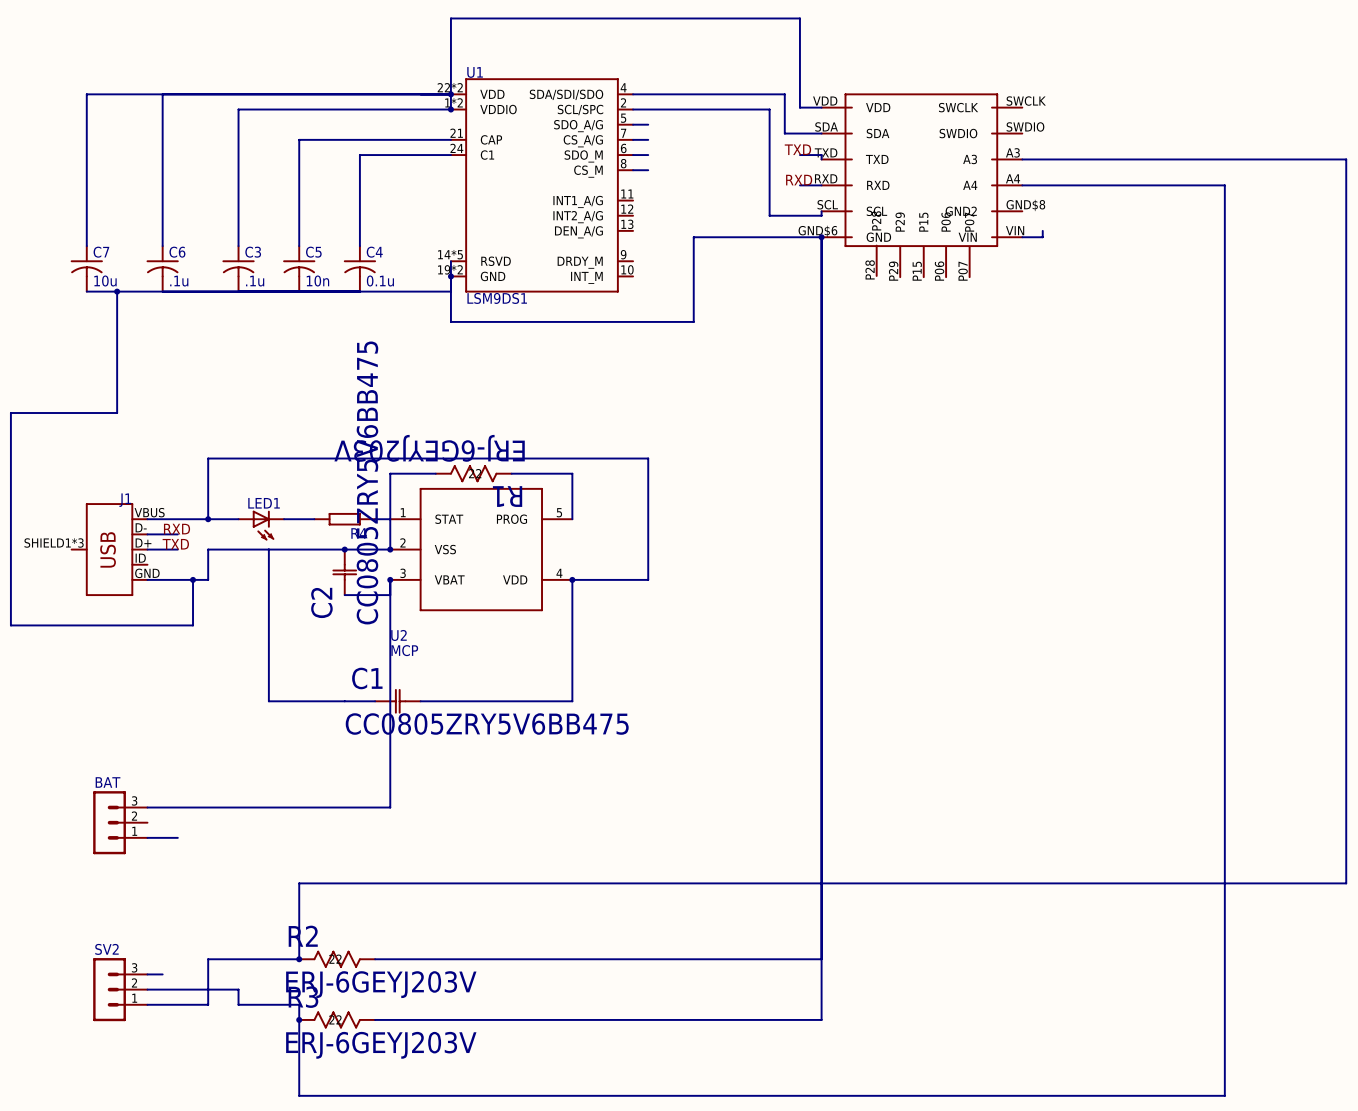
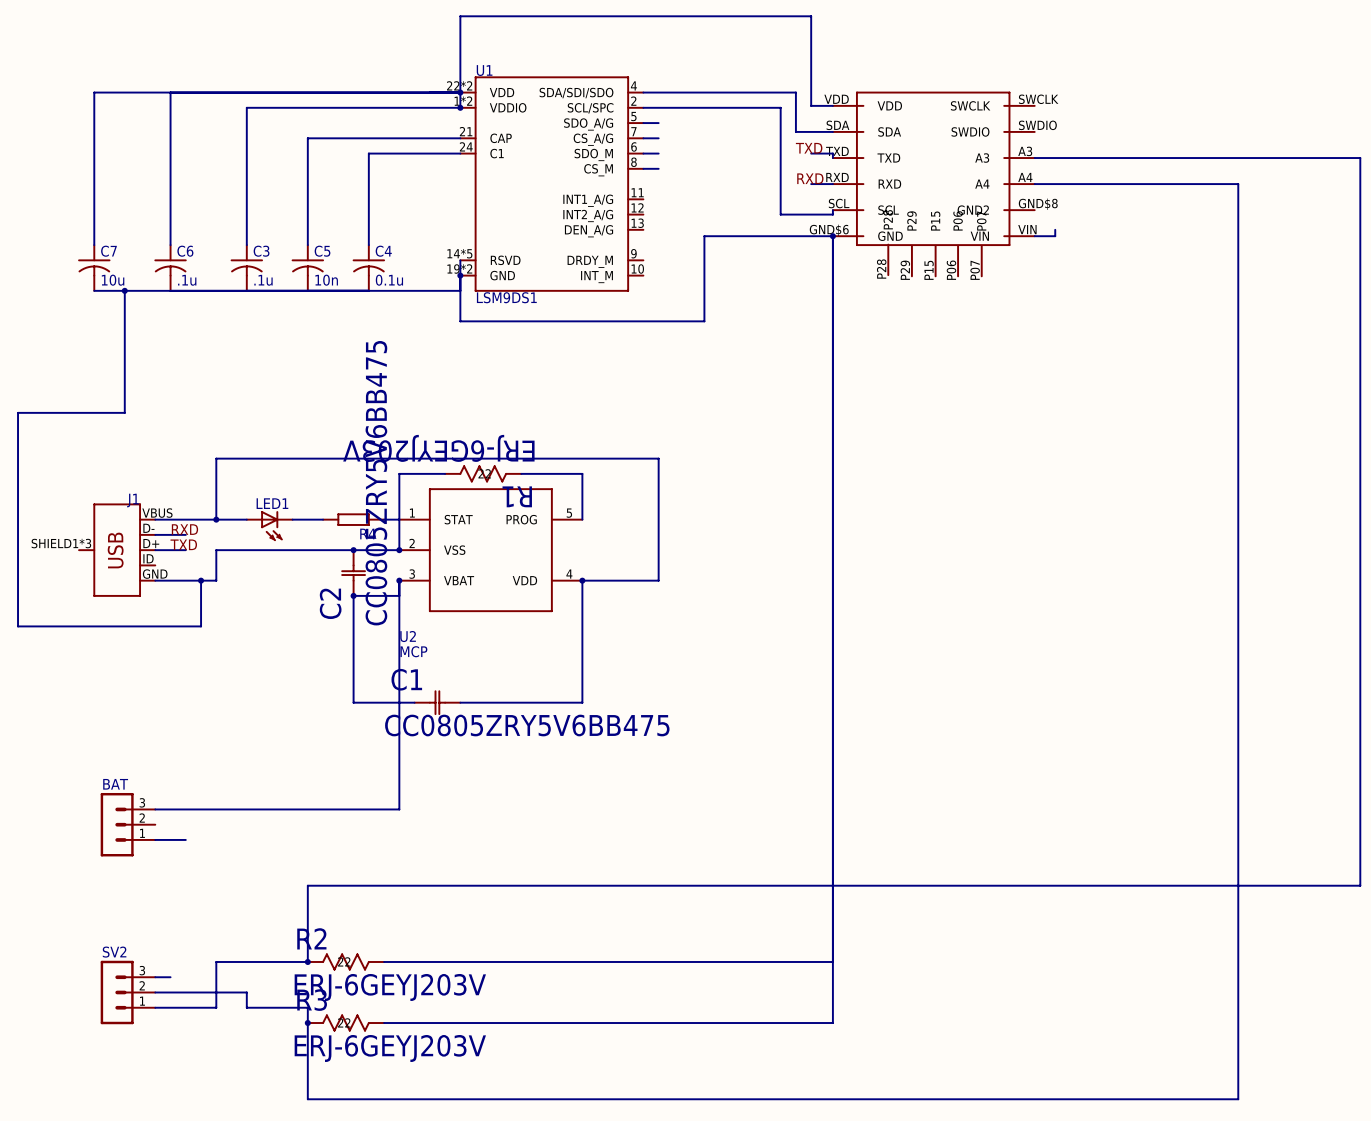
wire: (268, 549) (268, 701) (344, 701) -> (353, 595) (353, 702)
junction: none -> (353, 595)
C1 position: (397, 701) -> (437, 702)

